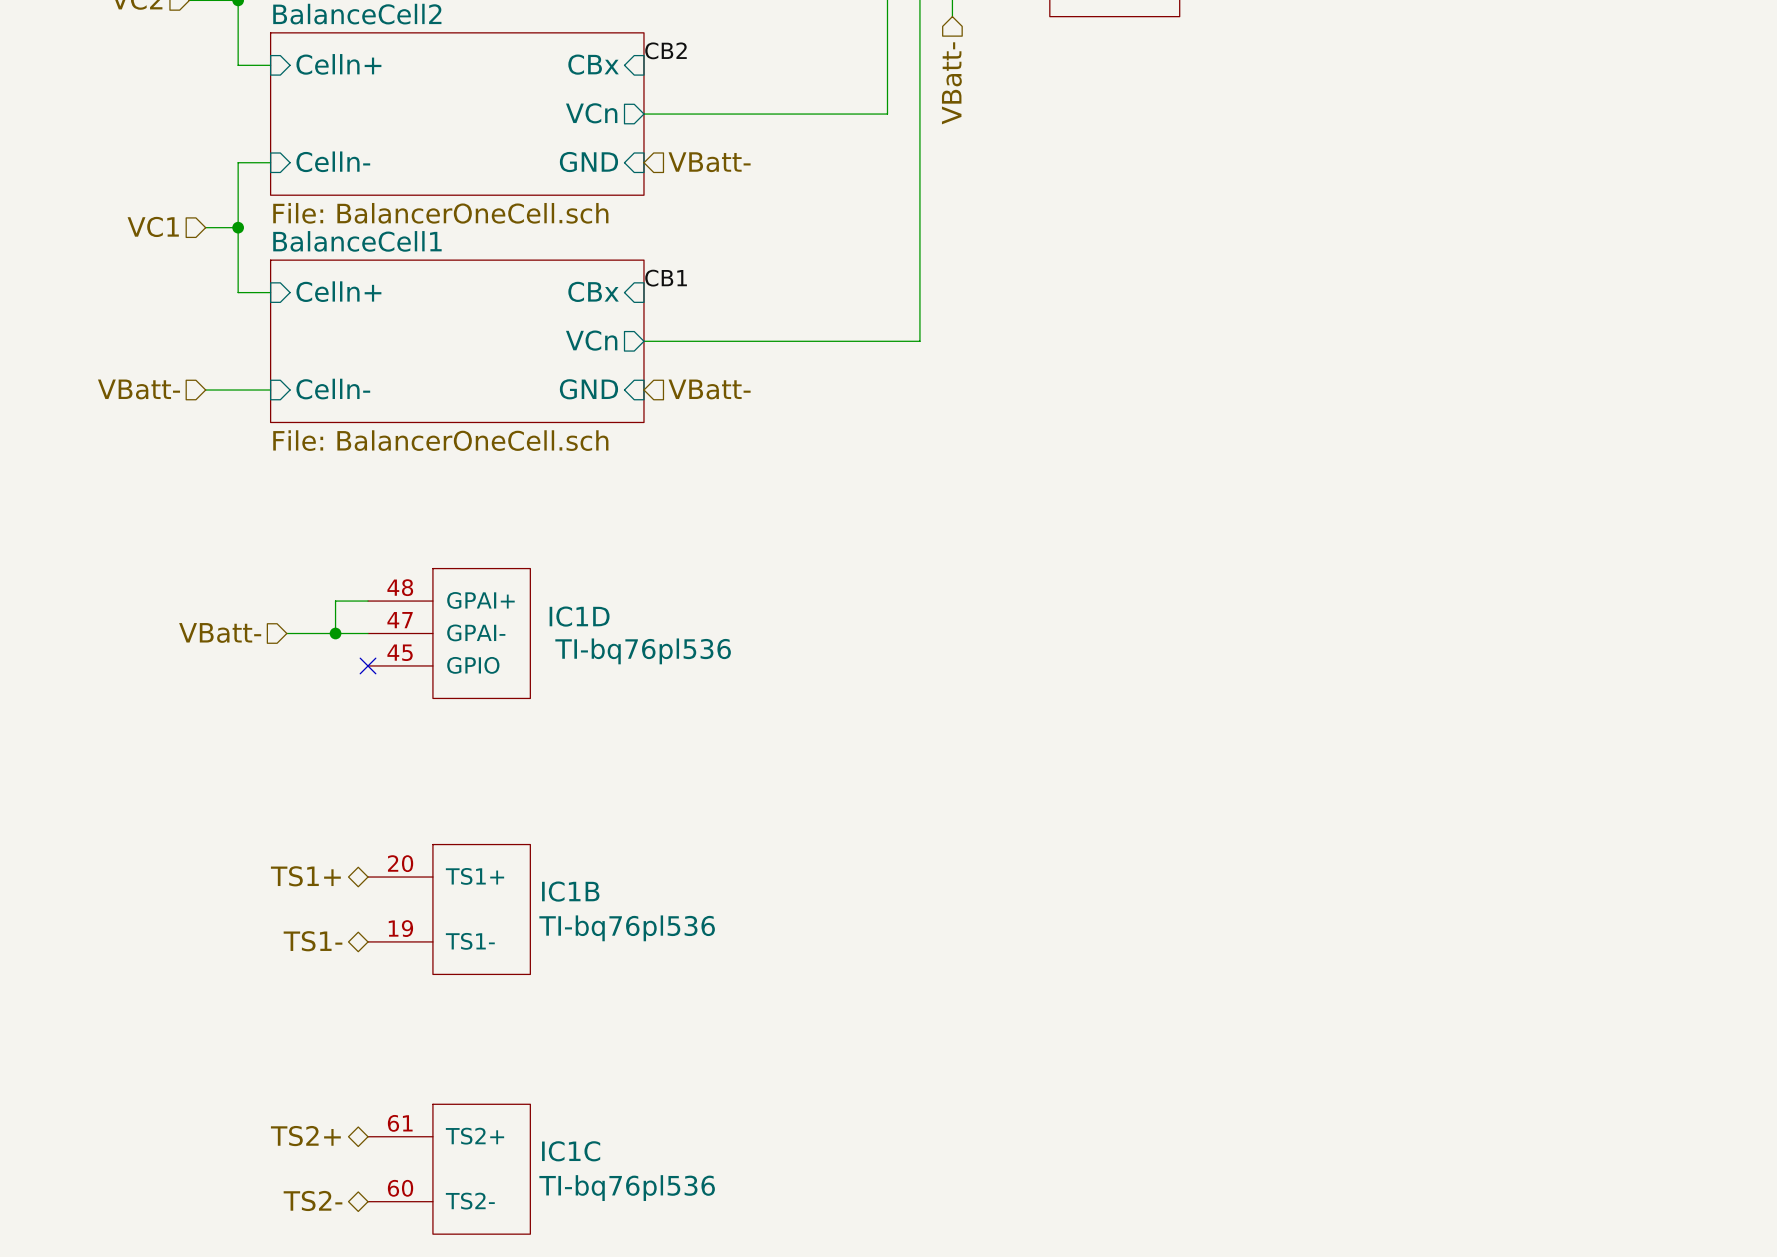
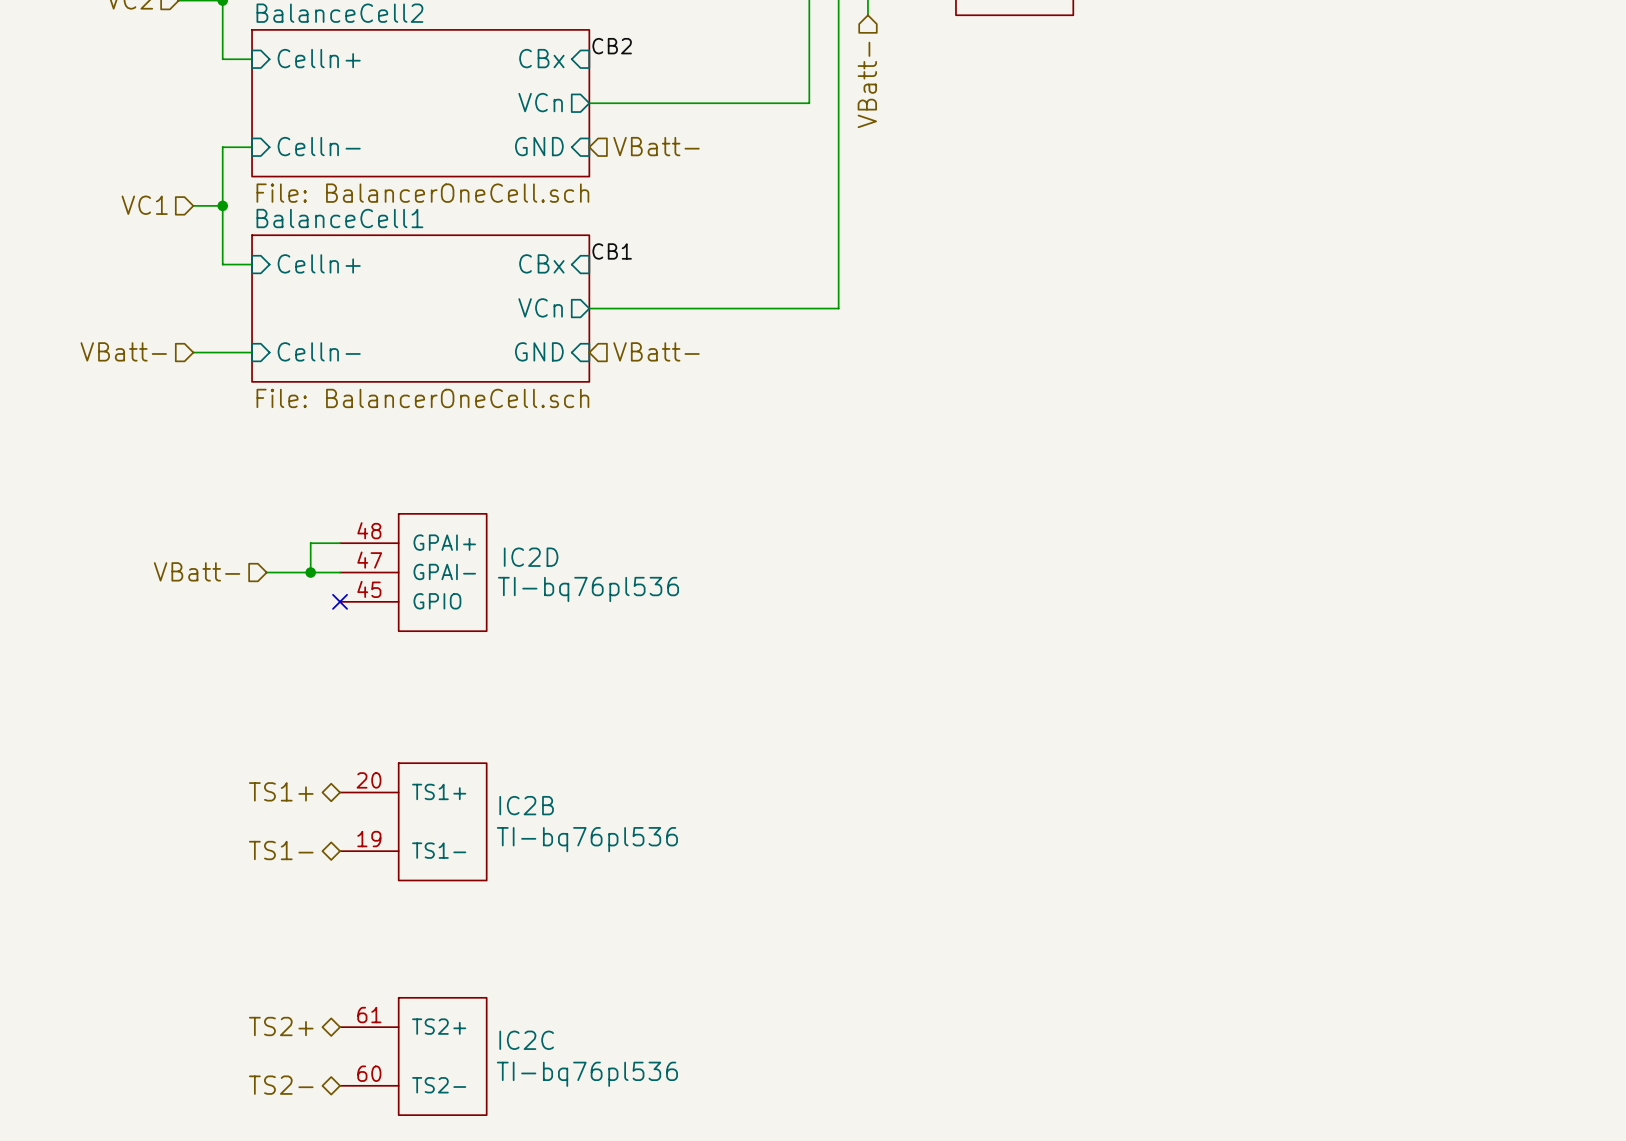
IC1D name: IC1D (579, 616) -> IC2D (531, 557)
IC1B name: IC1B (570, 891) -> IC2B (526, 805)
IC1C name: IC1C (571, 1151) -> IC2C (526, 1040)

